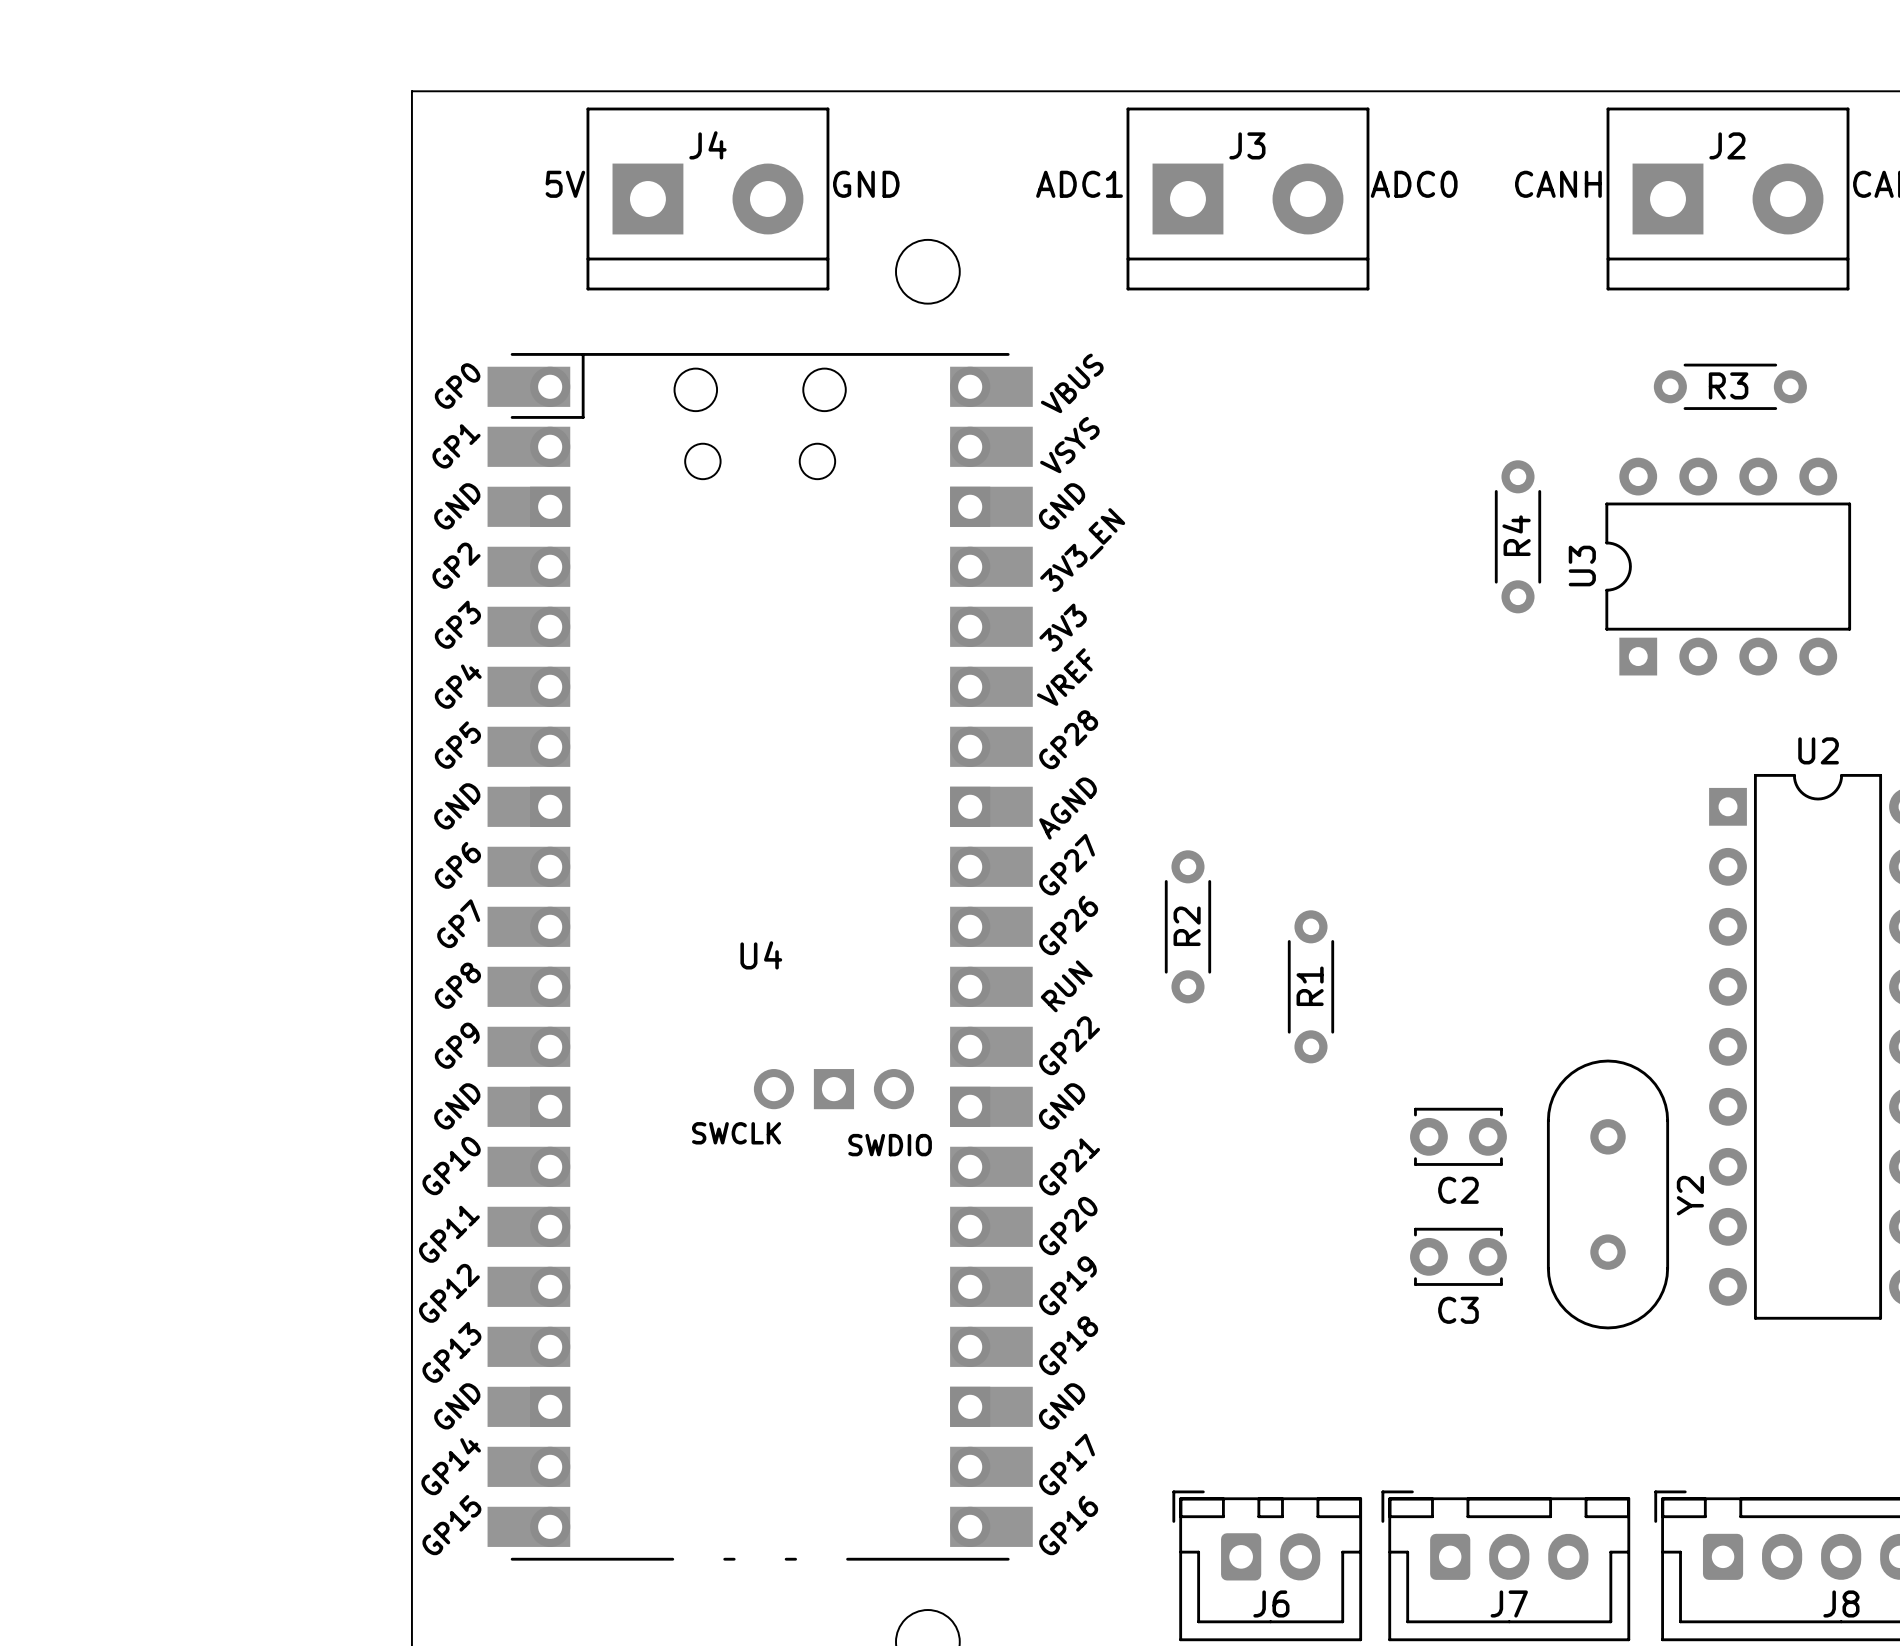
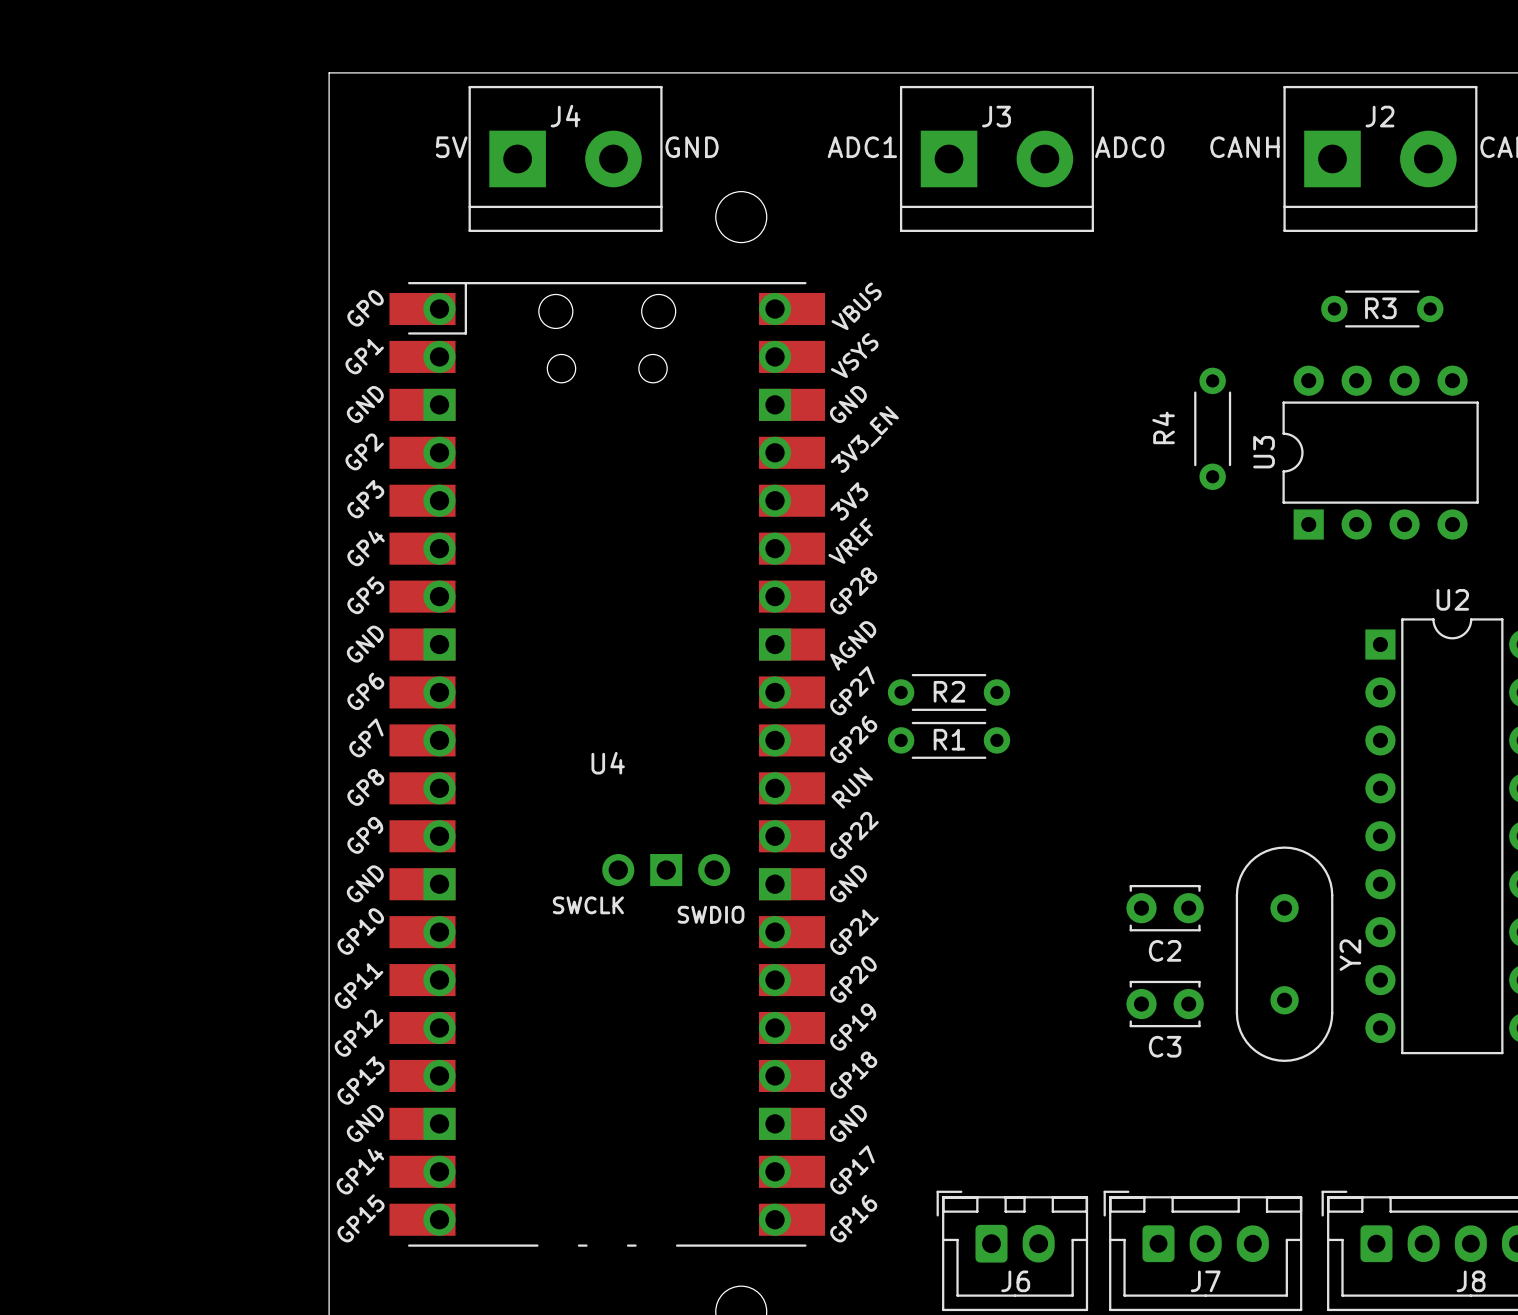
R4 name position: R4 (1516, 535) -> R4 (1163, 427)
R2 rotation: 0° (1187, 926) -> 90° clockwise (949, 692)
R1 rotation: 0° (1310, 986) -> 90° clockwise (949, 740)
R1 position: (1310, 986) -> (949, 740)

